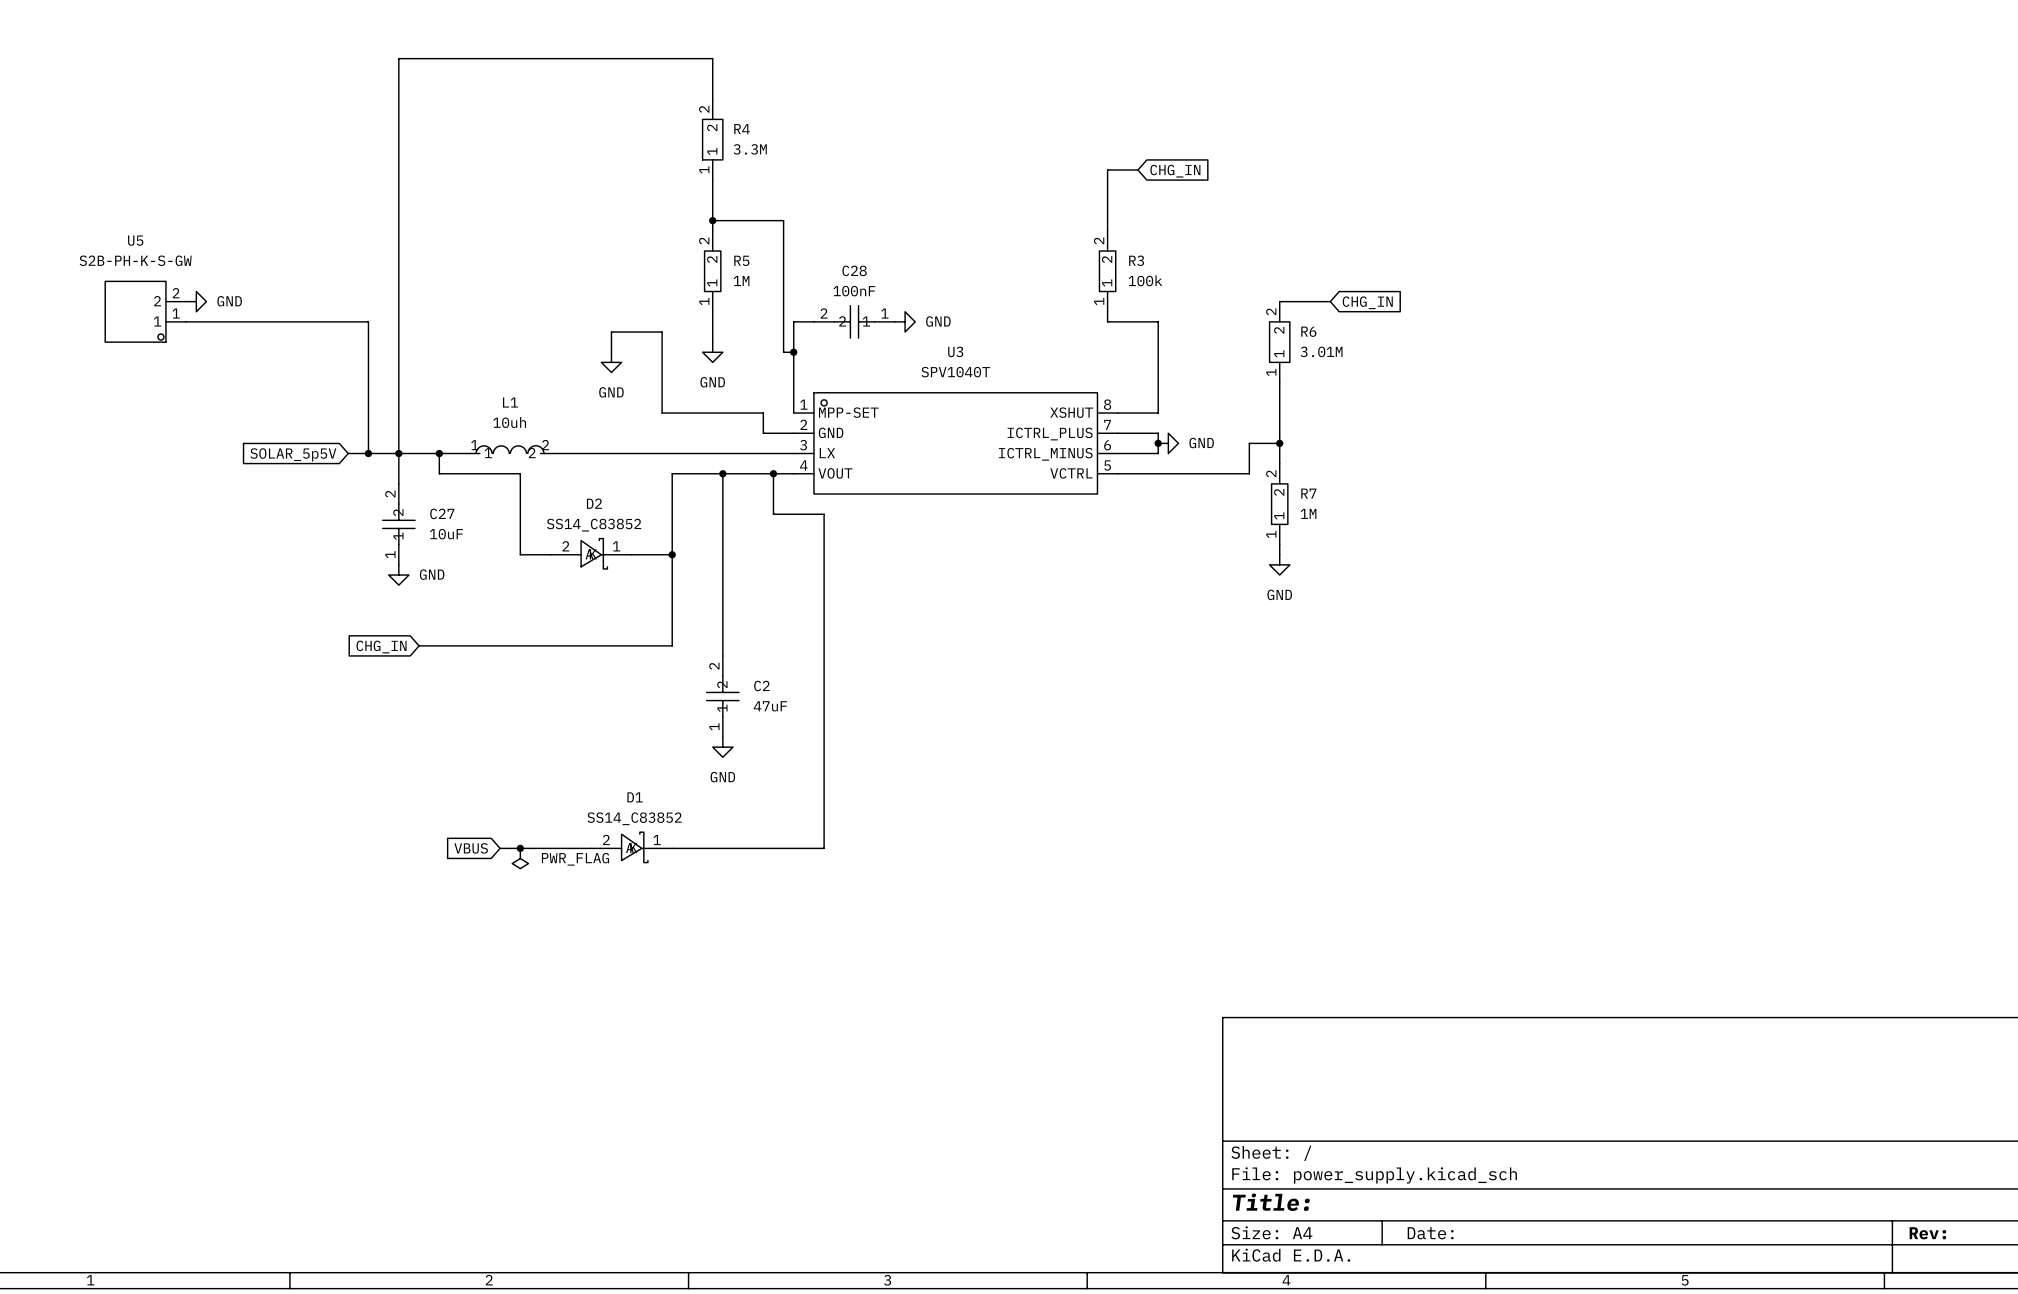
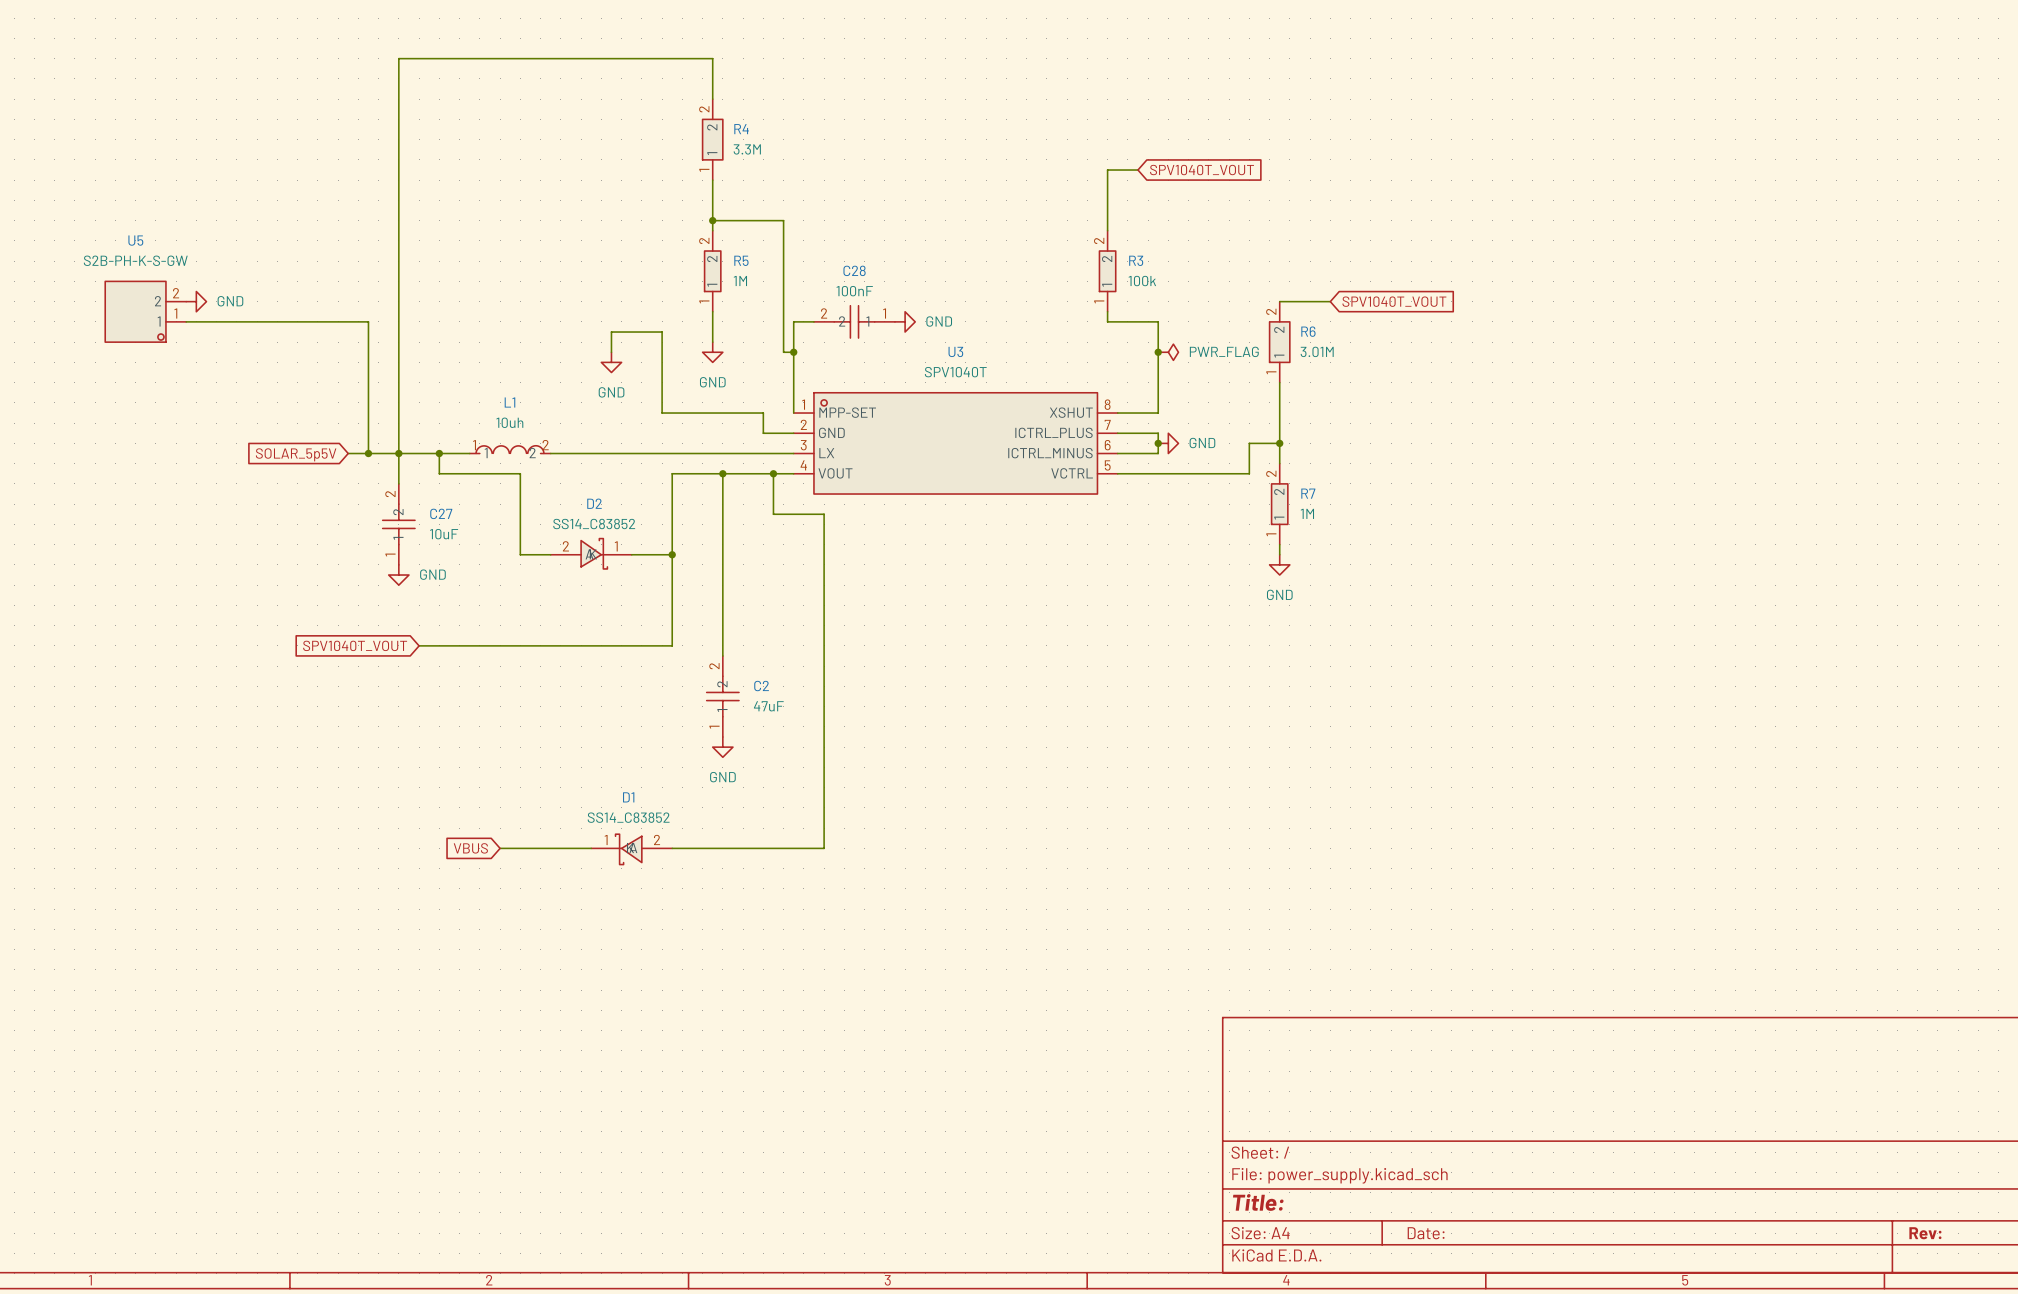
global label: CHG_IN (1175, 171) -> SPV1040T_VOUT (1202, 170)
global label: CHG_IN (1367, 302) -> SPV1040T_VOUT (1394, 301)
junction: none -> (1158, 352)
power symbol: none -> PWR_FLAG (1168, 352)
global label: CHG_IN (381, 647) -> SPV1040T_VOUT (355, 645)
D1 rotation: 0° (634, 847) -> 180° (628, 849)
junction: (520, 848) -> none
power symbol: PWR_FLAG (520, 858) -> none

